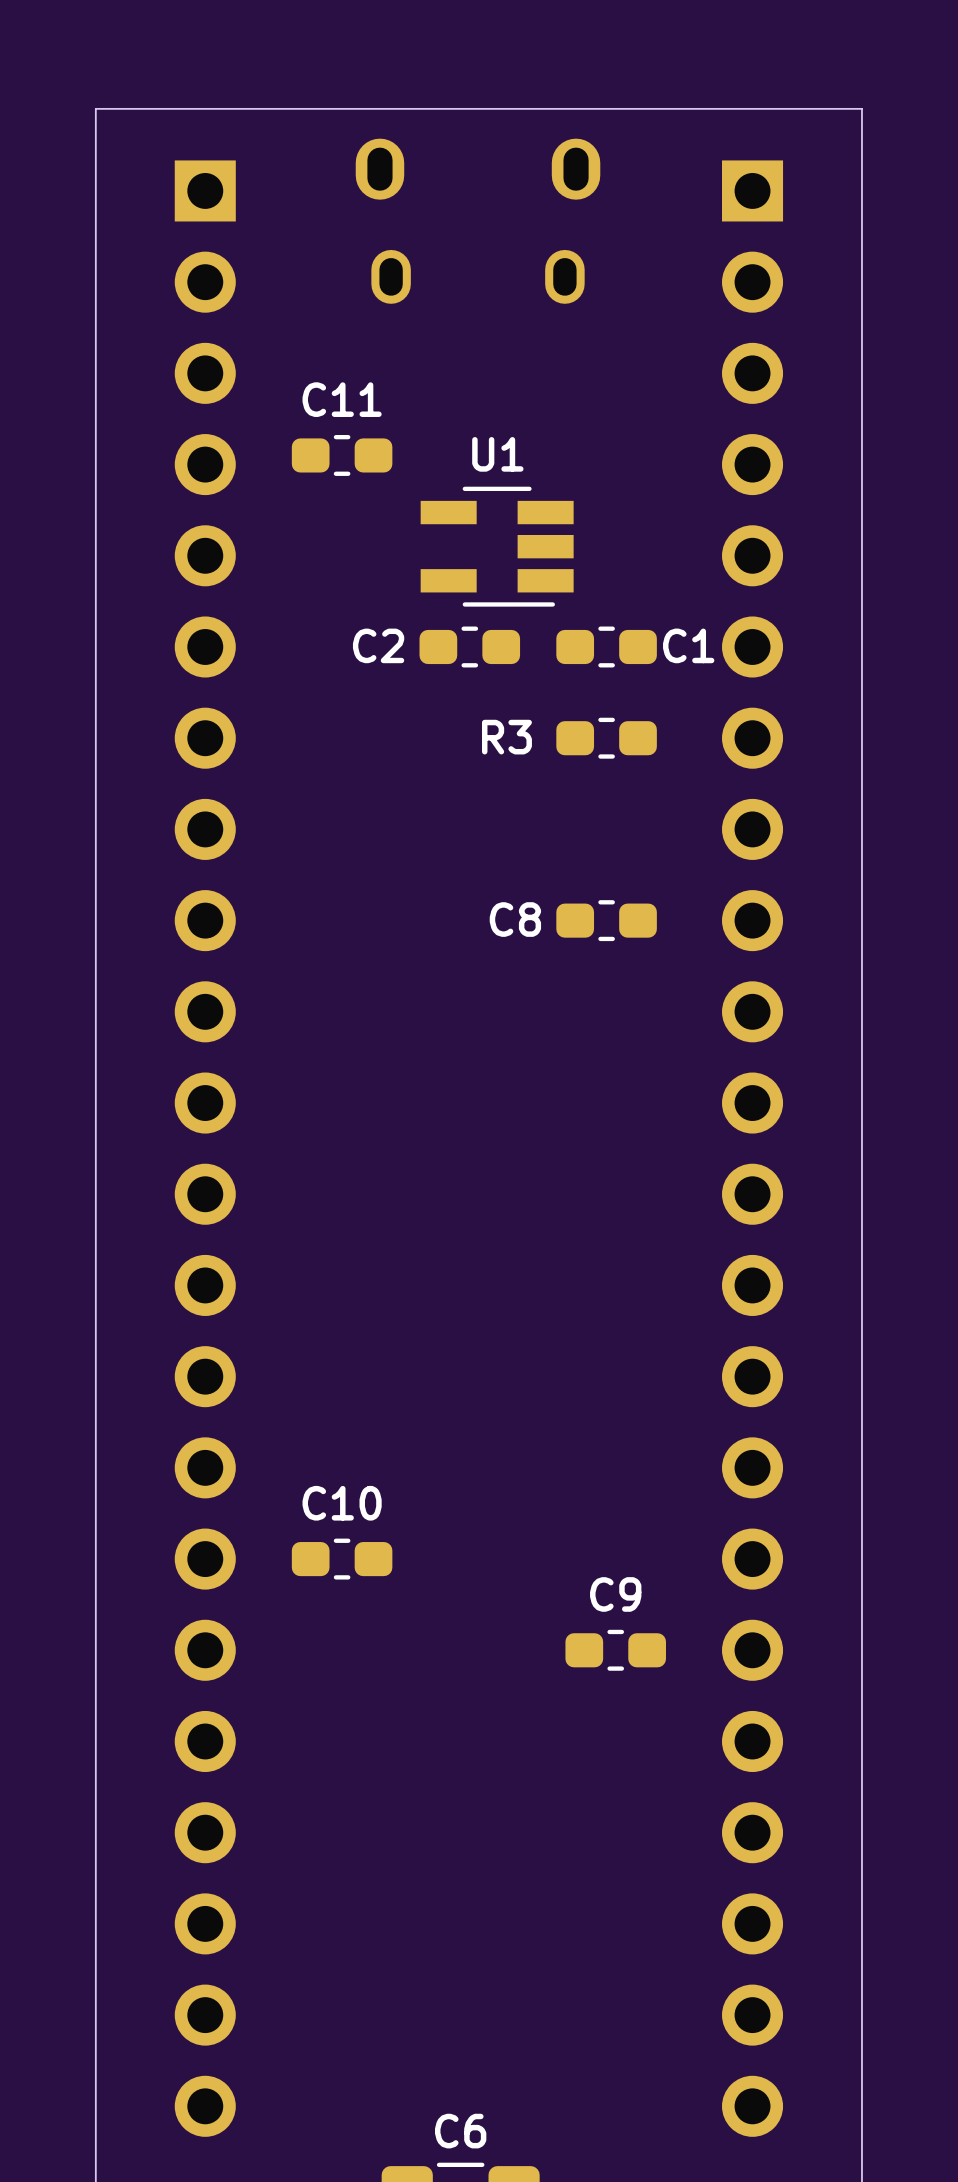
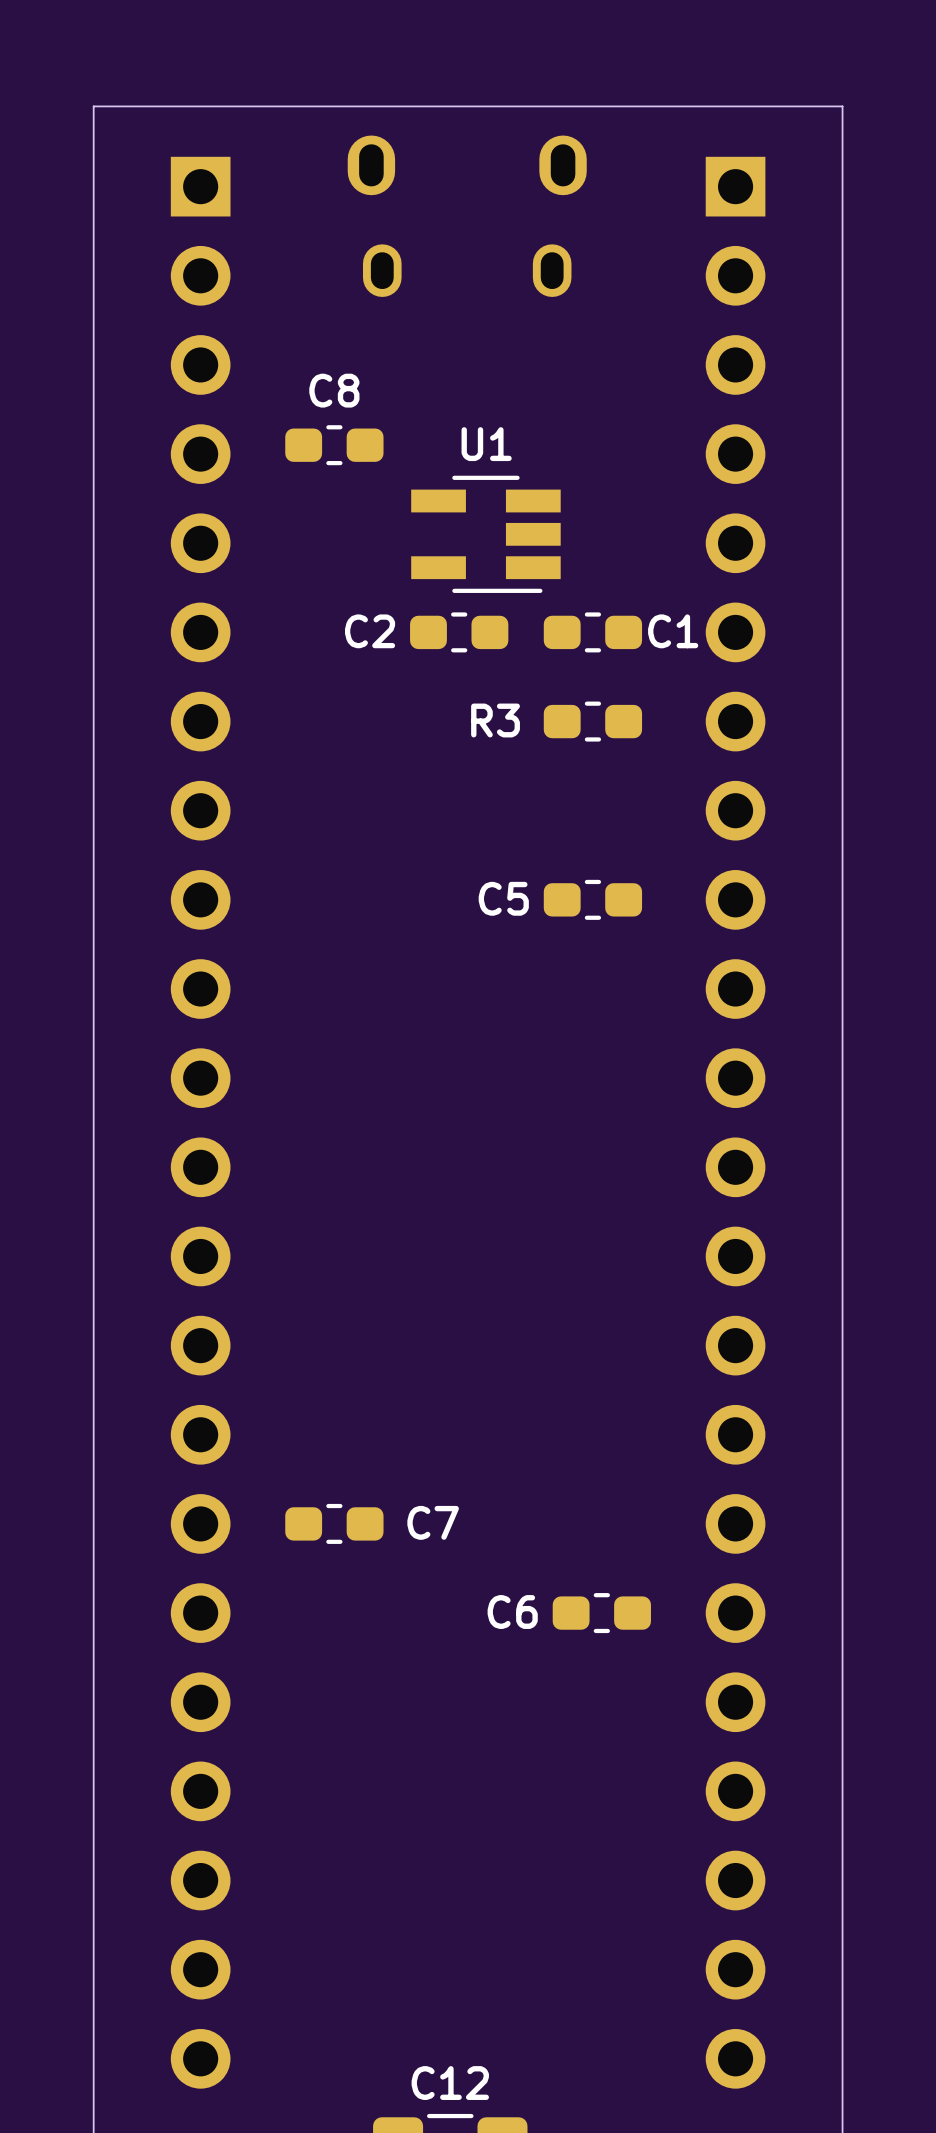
C11 name: C11 (342, 399) -> C8 (334, 390)
C8 name: C8 (515, 919) -> C5 (503, 898)
C10 name: C10 (342, 1503) -> C7 (433, 1522)
C9 name: C9 (615, 1594) -> C6 (512, 1612)
C6 name: C6 (460, 2131) -> C12 (450, 2083)

